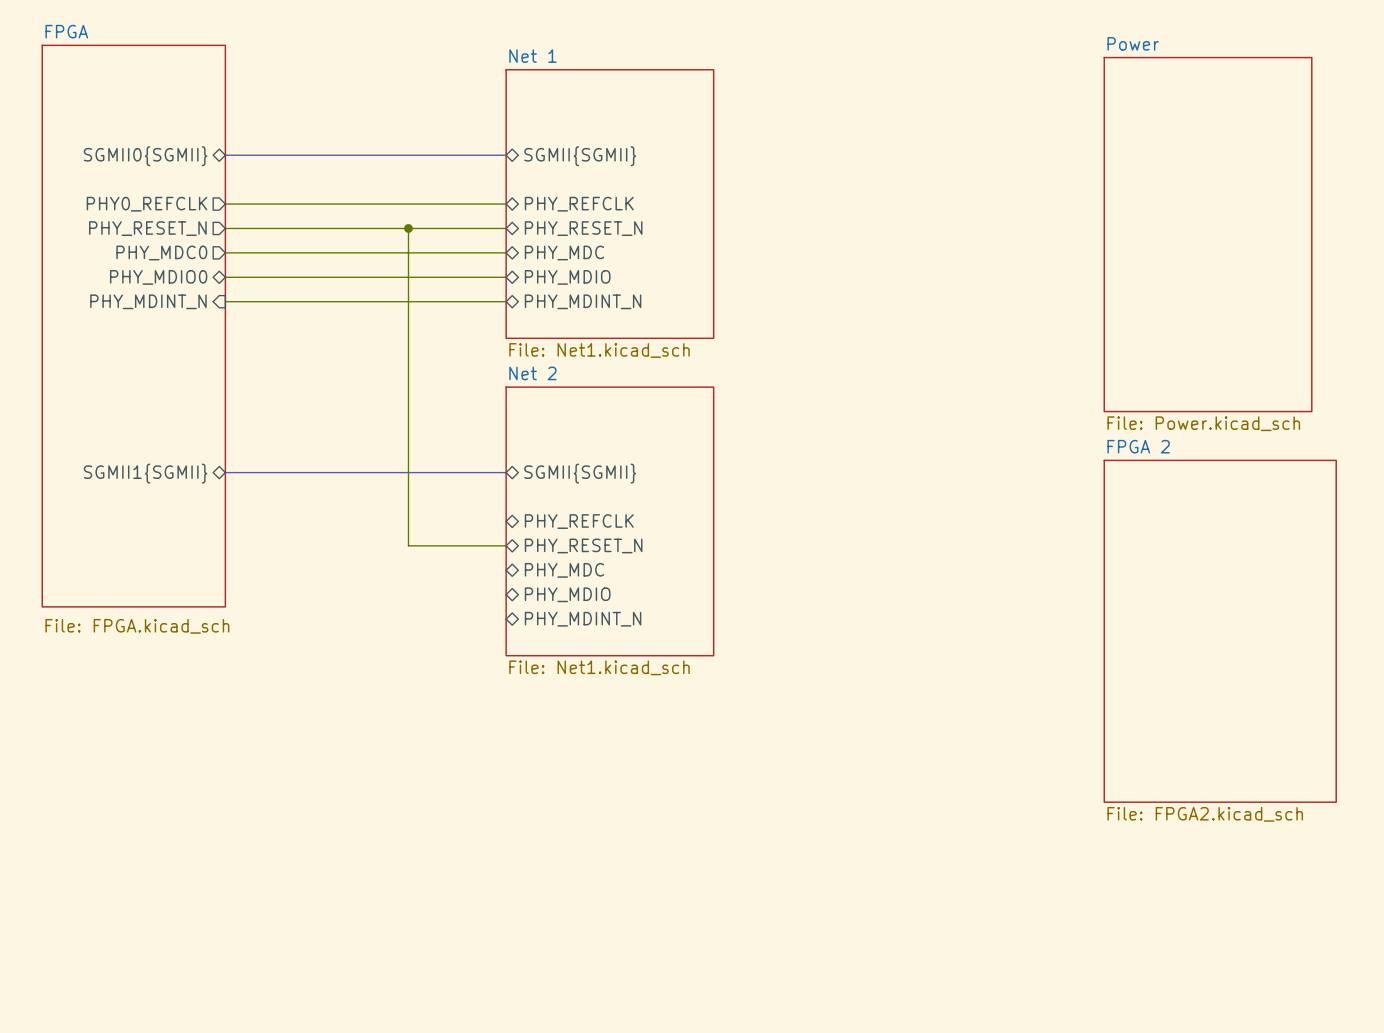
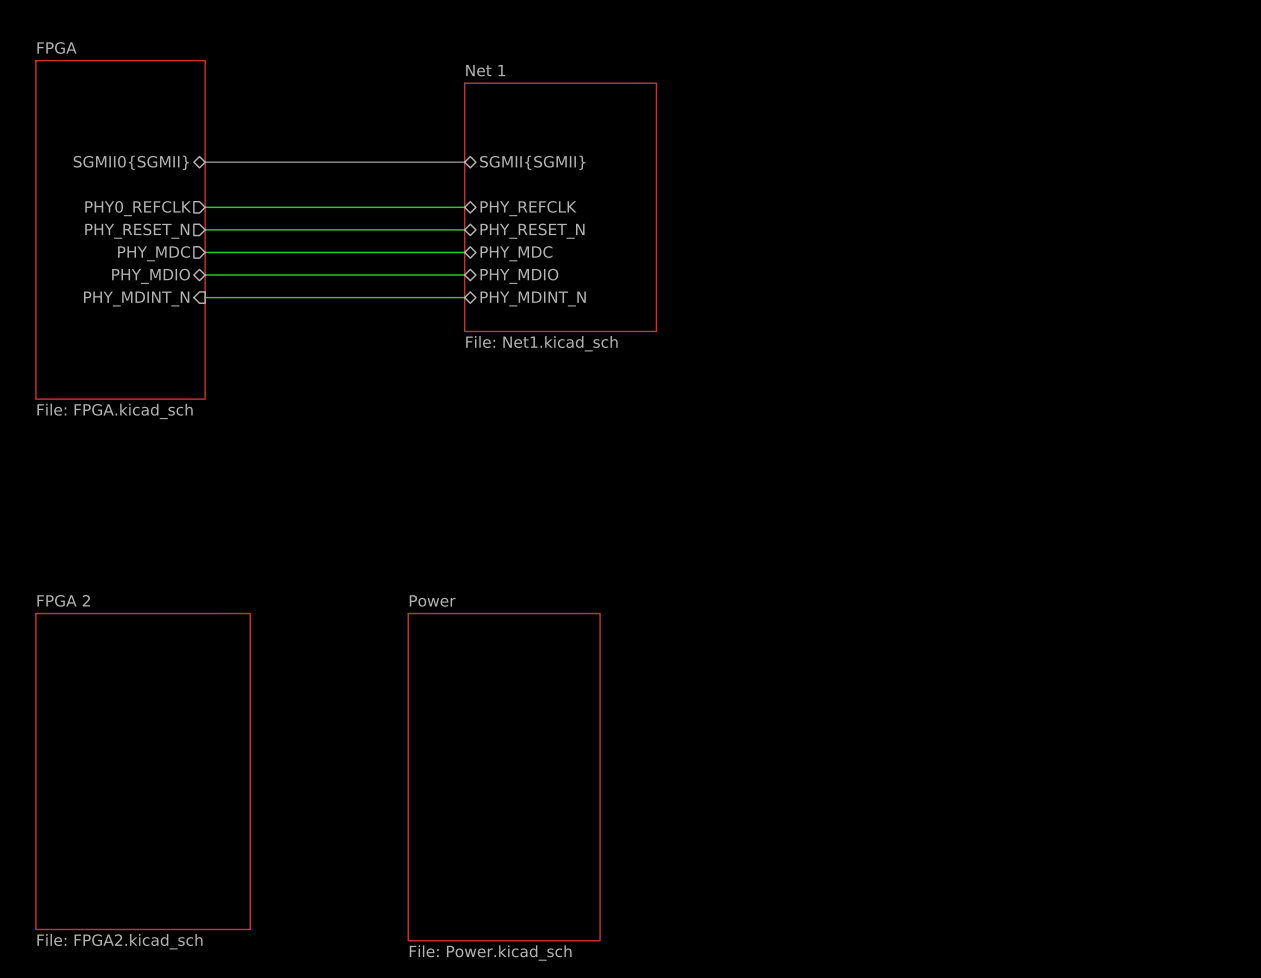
sheet FPGA: none -> File: FPGA.kicad_sch (120, 229)
wire: (408, 228) (408, 545) (506, 545) -> none
junction: (408, 228) -> none
sheet Power: File: Power.kicad_sch (1208, 234) -> none
sheet pin: PHY_MDC0 (161, 253) -> PHY_MDC (154, 253)
sheet pin: PHY_MDIO0 (158, 277) -> PHY_MDIO (151, 276)
sheet FPGA: File: FPGA.kicad_sch (133, 326) -> none
bus: (225, 472) (506, 472) -> none
sheet pin: SGMII1{SGMII} (145, 473) -> none
sheet pin: SGMII{SGMII} (580, 473) -> none
sheet pin: PHY_REFCLK (579, 521) -> none
sheet Net 2: File: Net1.kicad_sch (609, 521) -> none
sheet pin: PHY_RESET_N (583, 545) -> none
sheet pin: PHY_MDC (564, 570) -> none
sheet pin: PHY_MDIO (567, 594) -> none
sheet pin: PHY_MDINT_N (583, 619) -> none
sheet FPGA 2 position: (1220, 631) -> (143, 771)
sheet Power: none -> File: Power.kicad_sch (504, 777)

